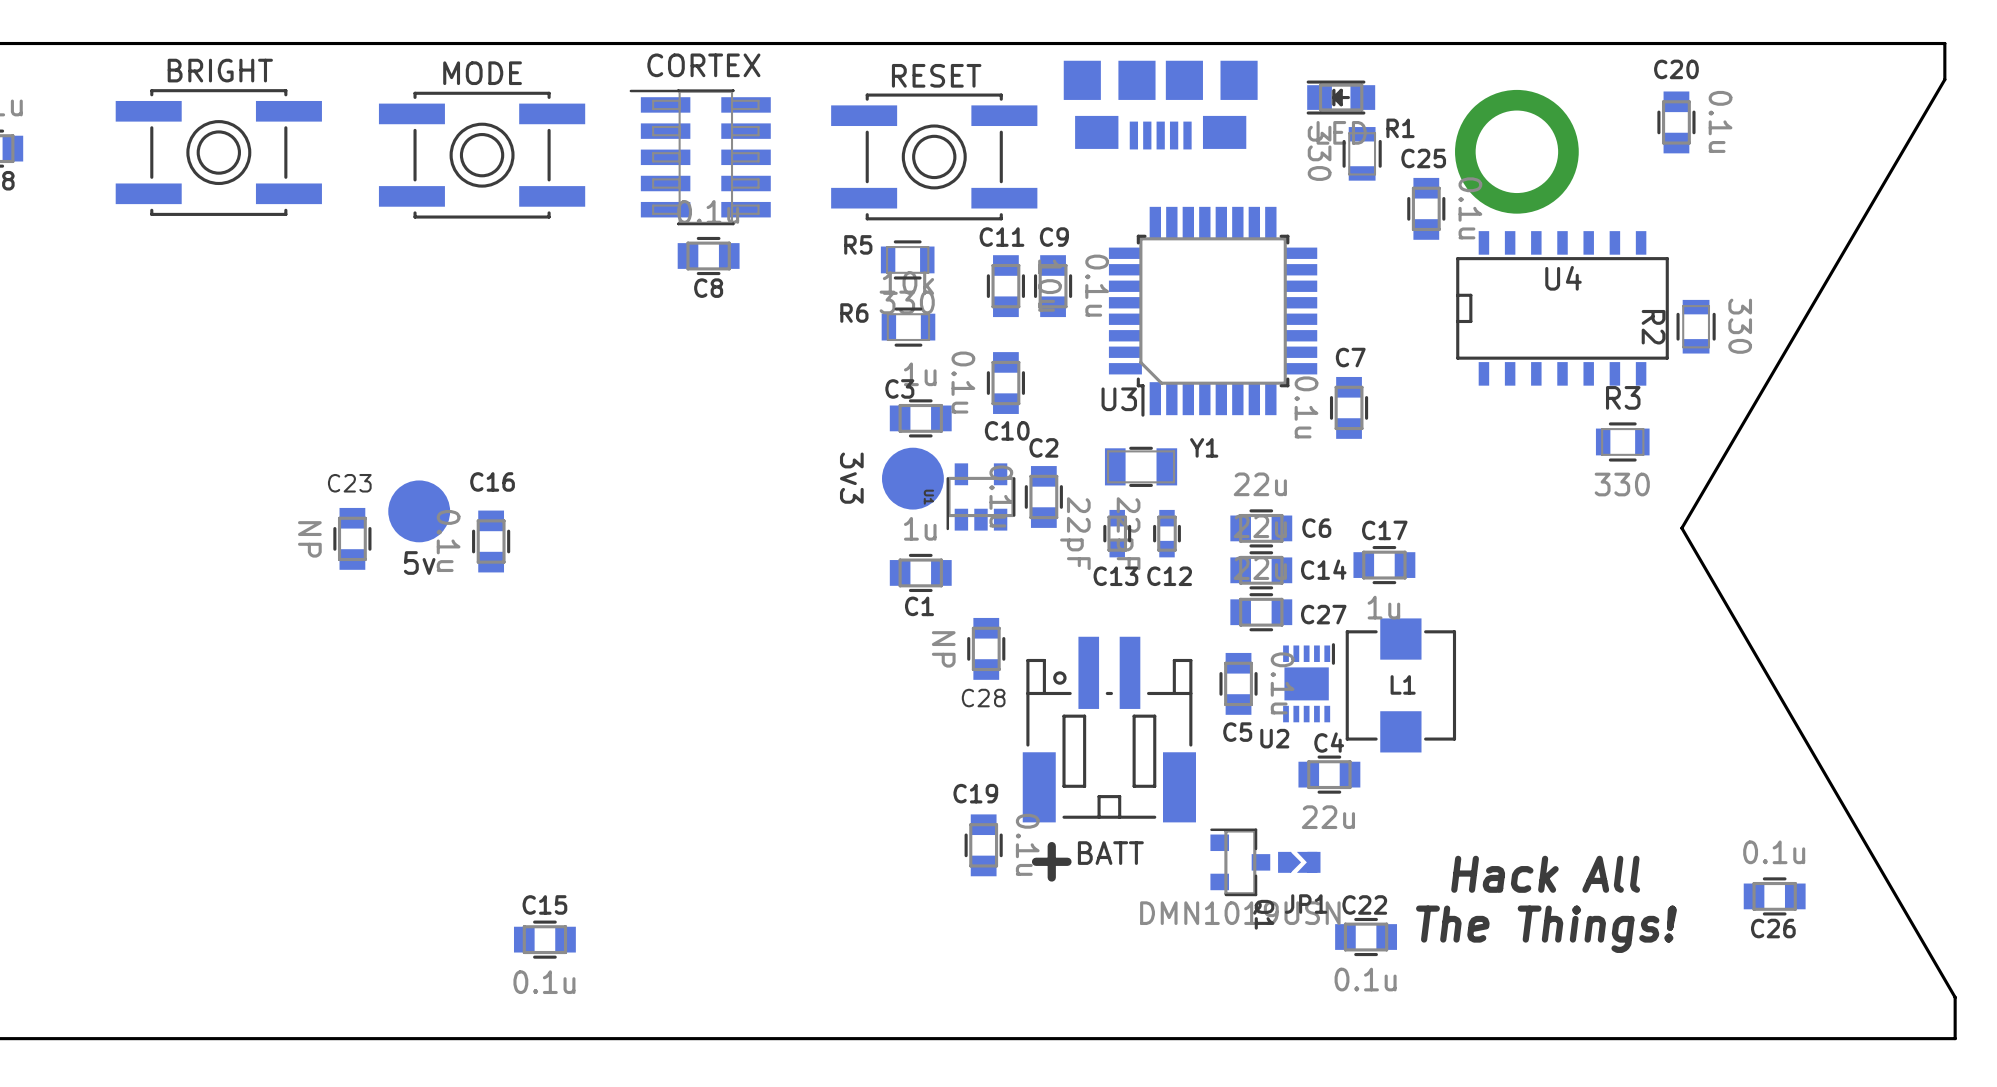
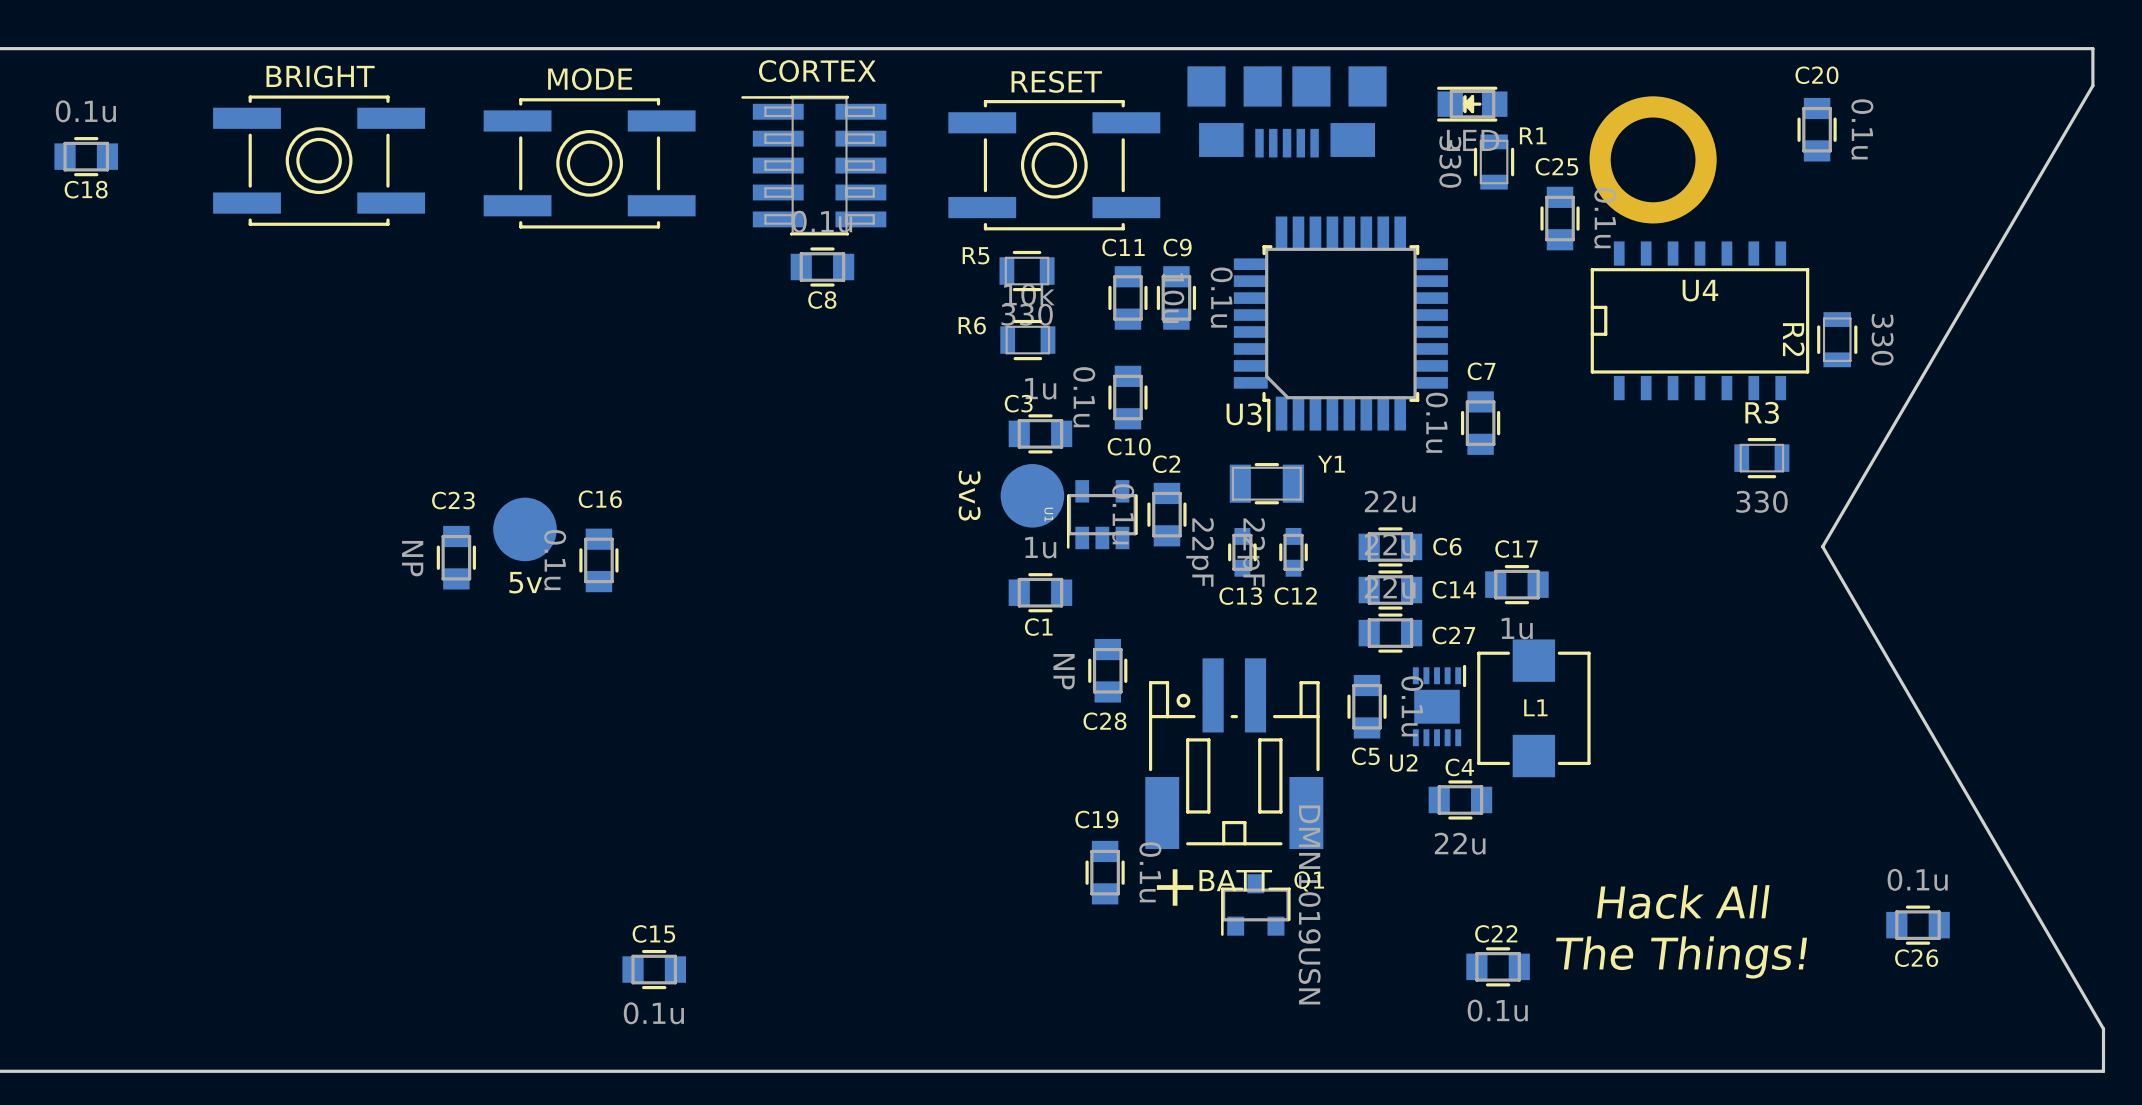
Q1 rotation: 0° (1240, 862) -> 90° counterclockwise (1255, 905)
Q1 position: (1240, 862) -> (1255, 905)
JP1: (1299, 862) -> none

